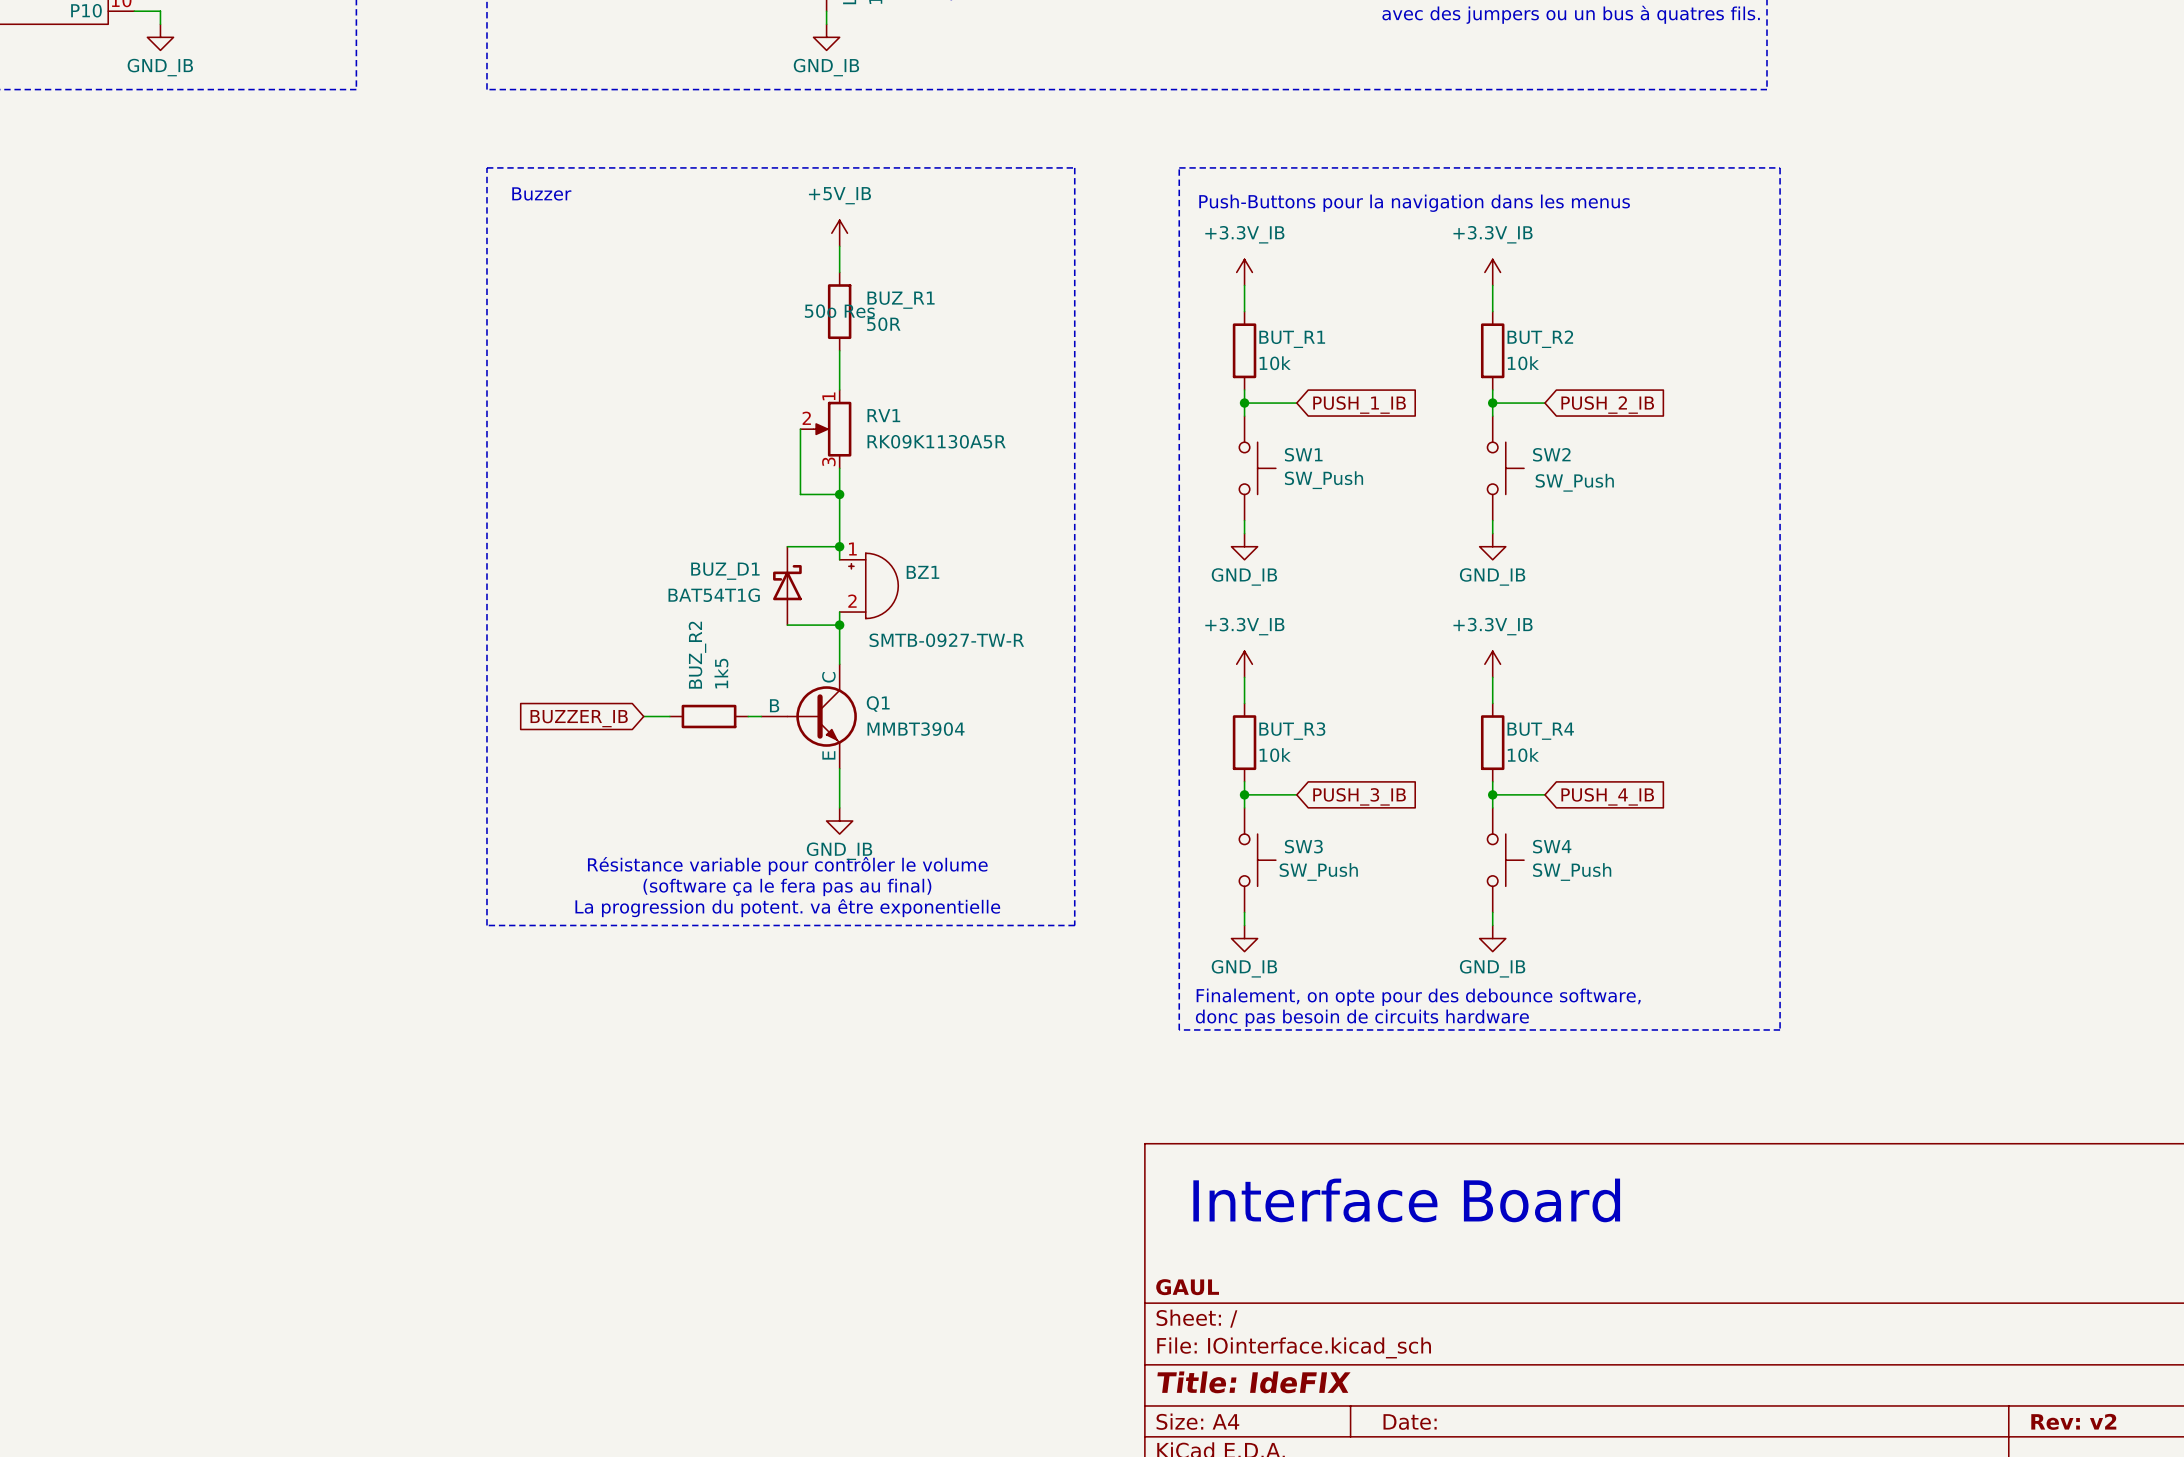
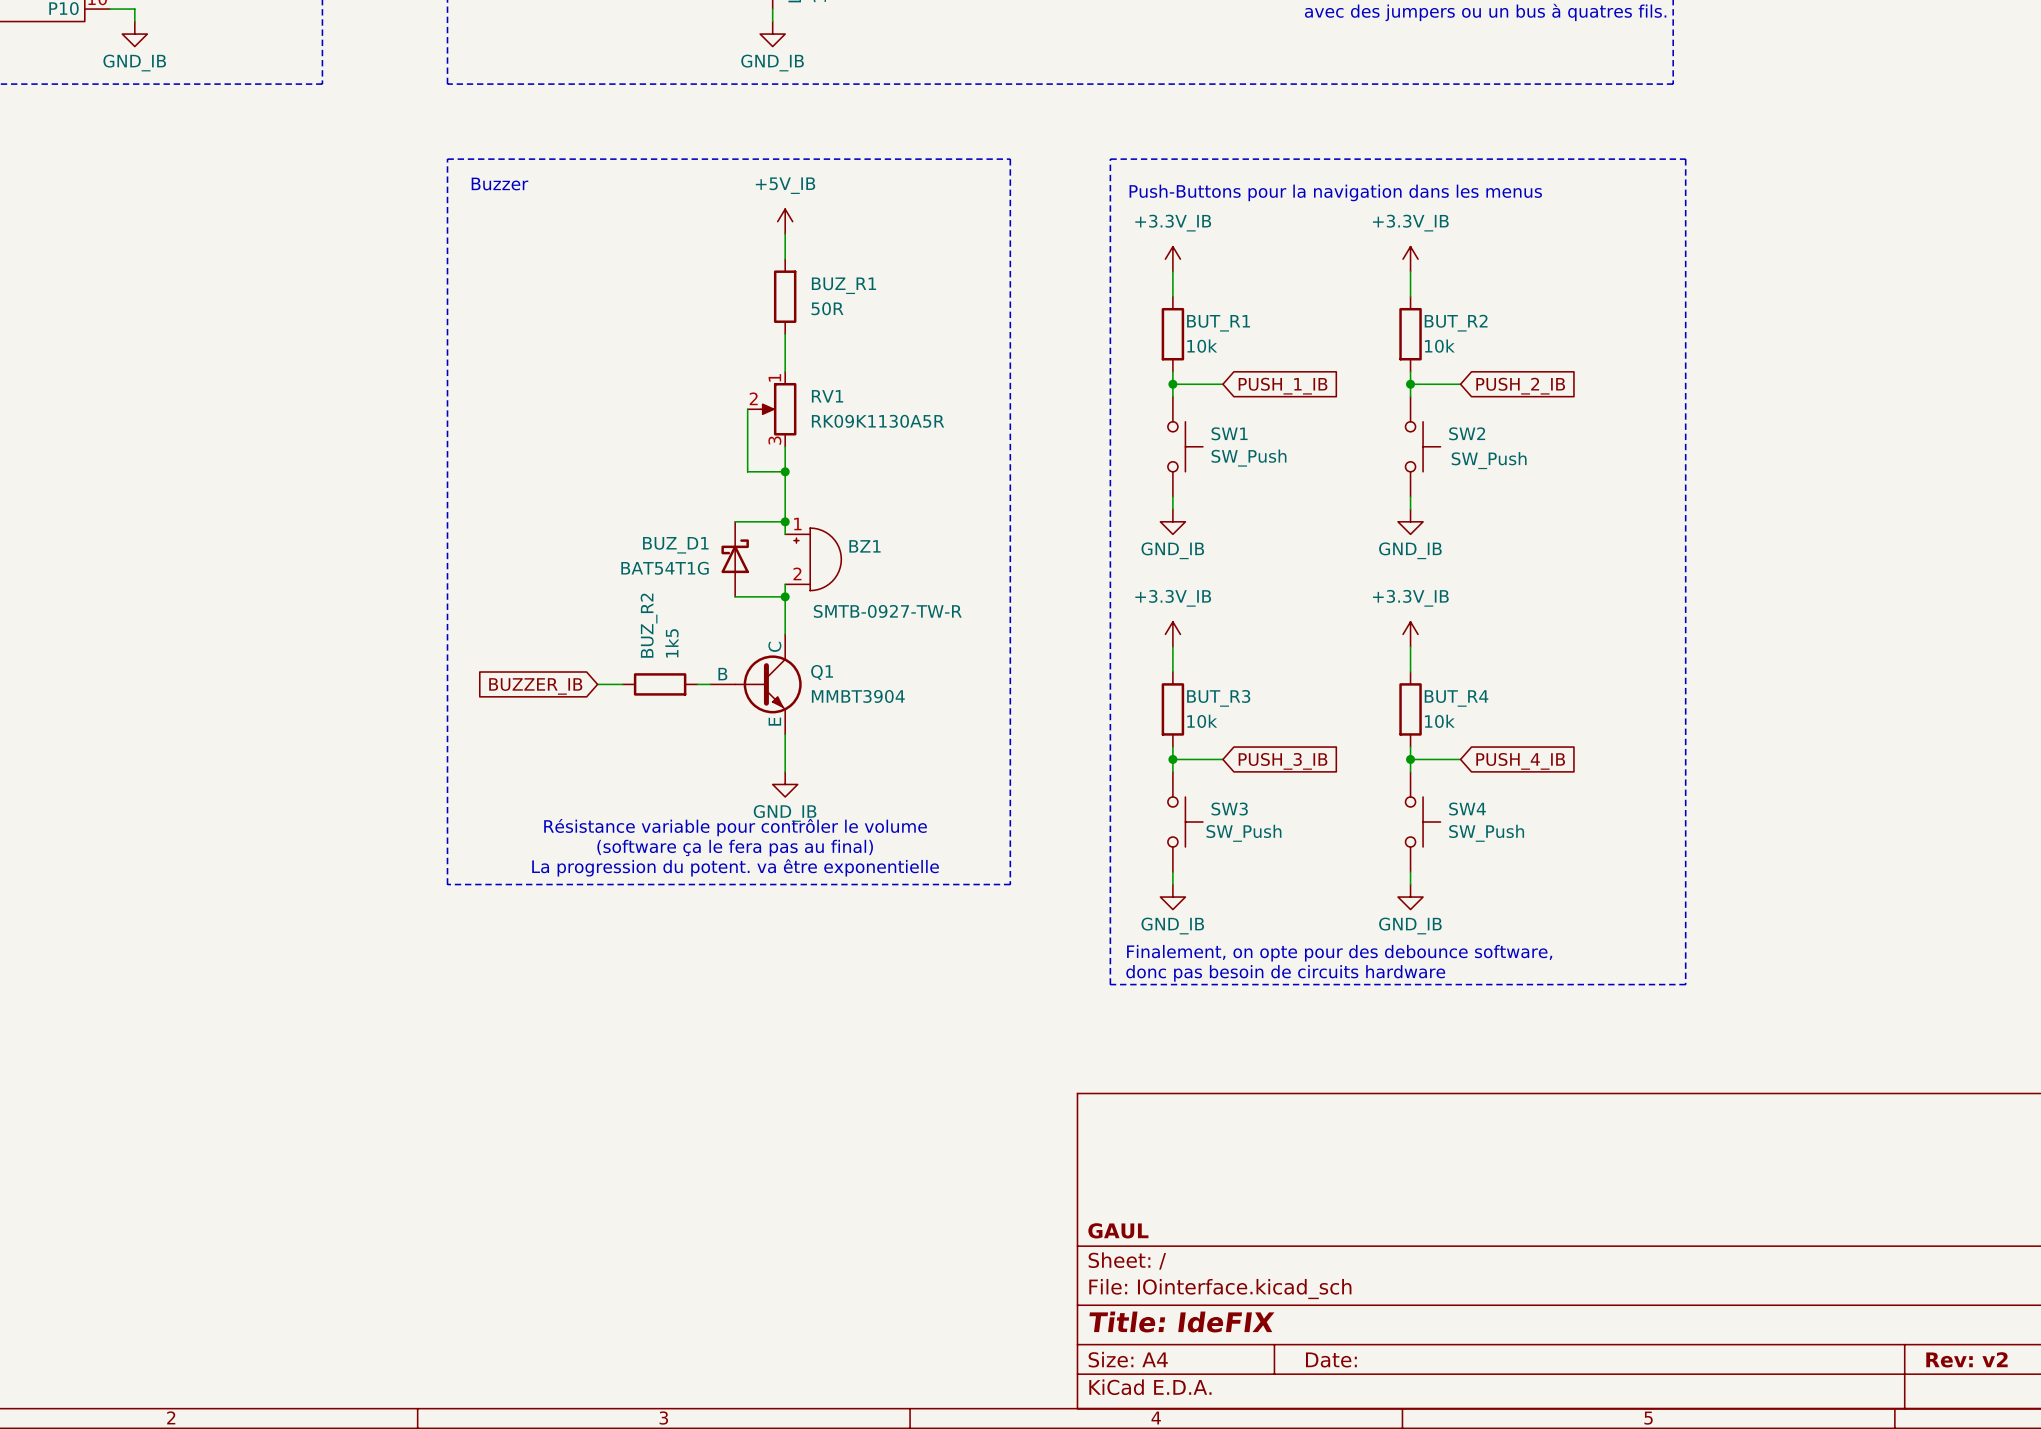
BUZ_R1 text: 50o Res (839, 311) -> none
text: Interface Board (1406, 1200) -> none

